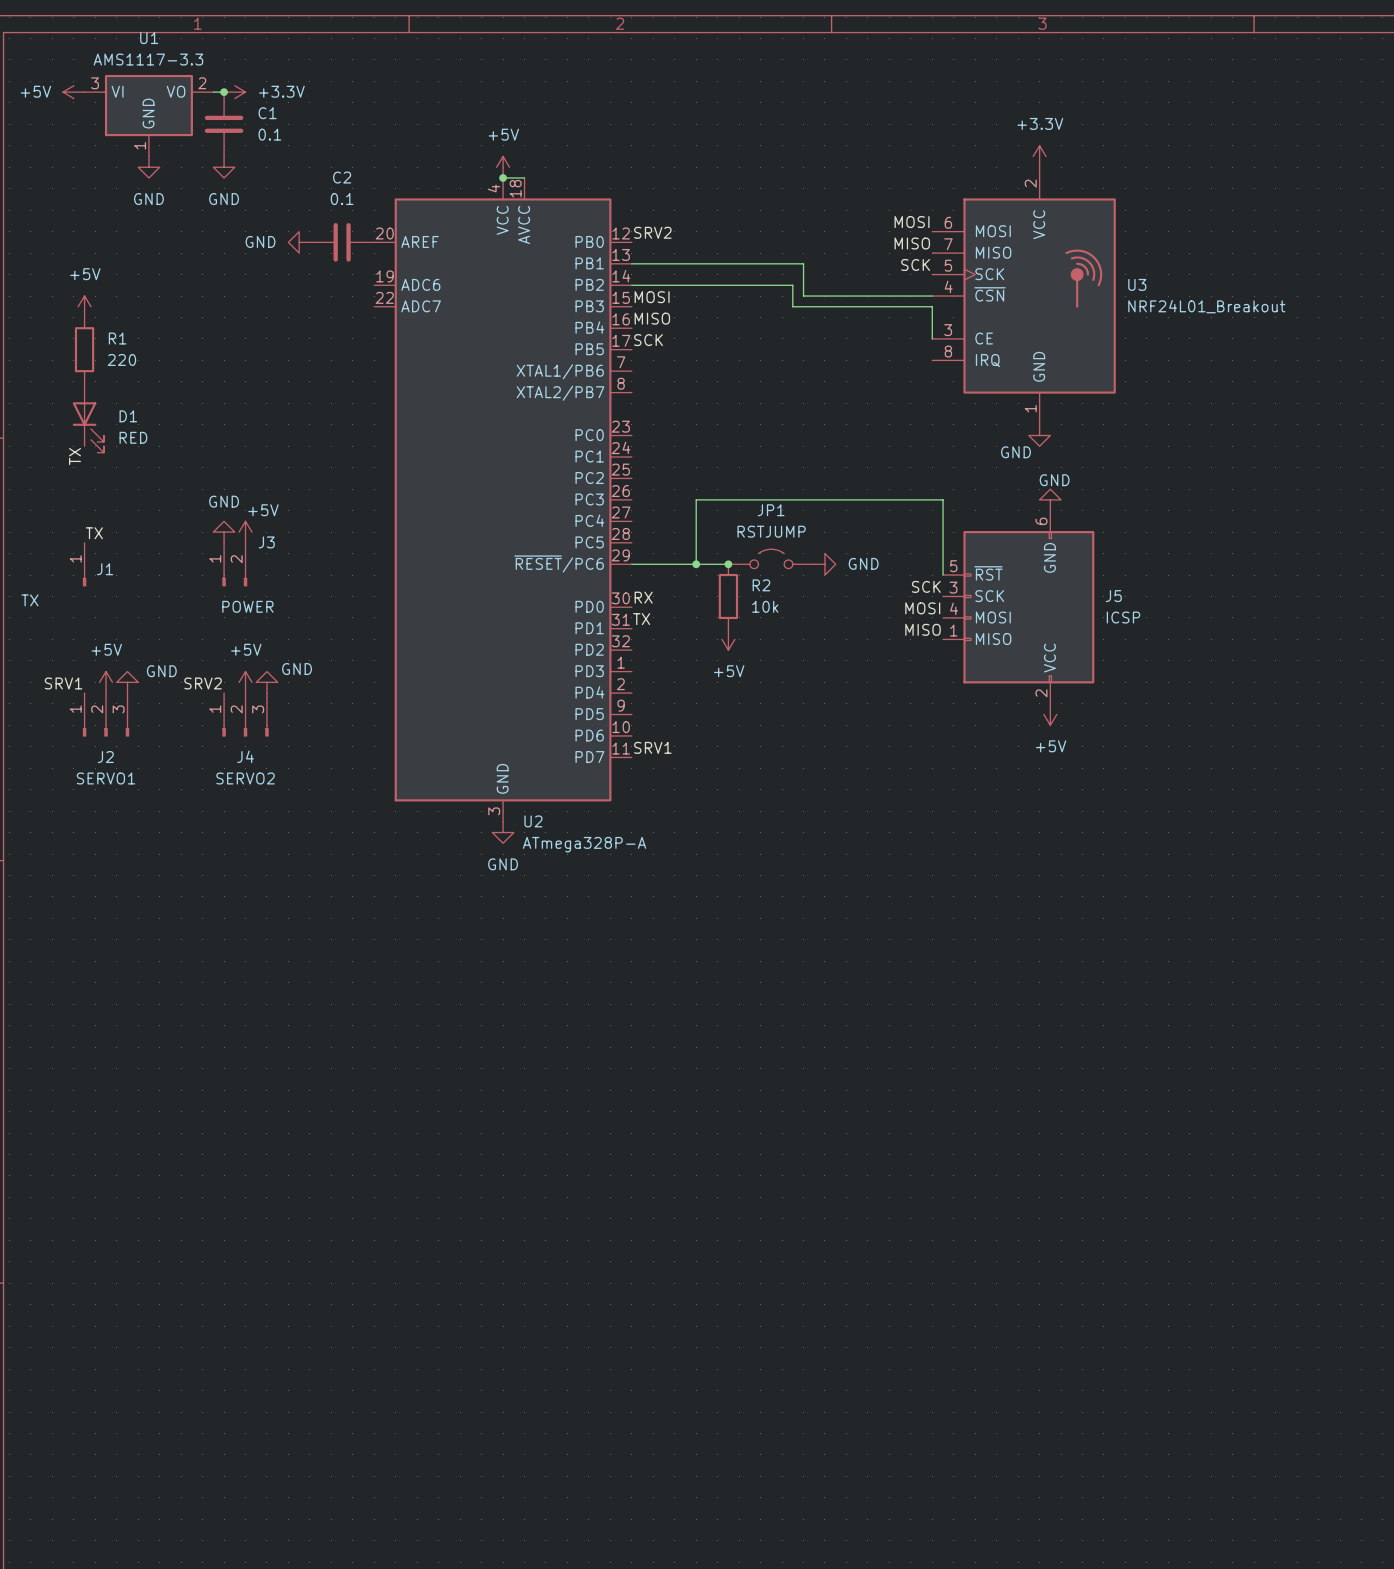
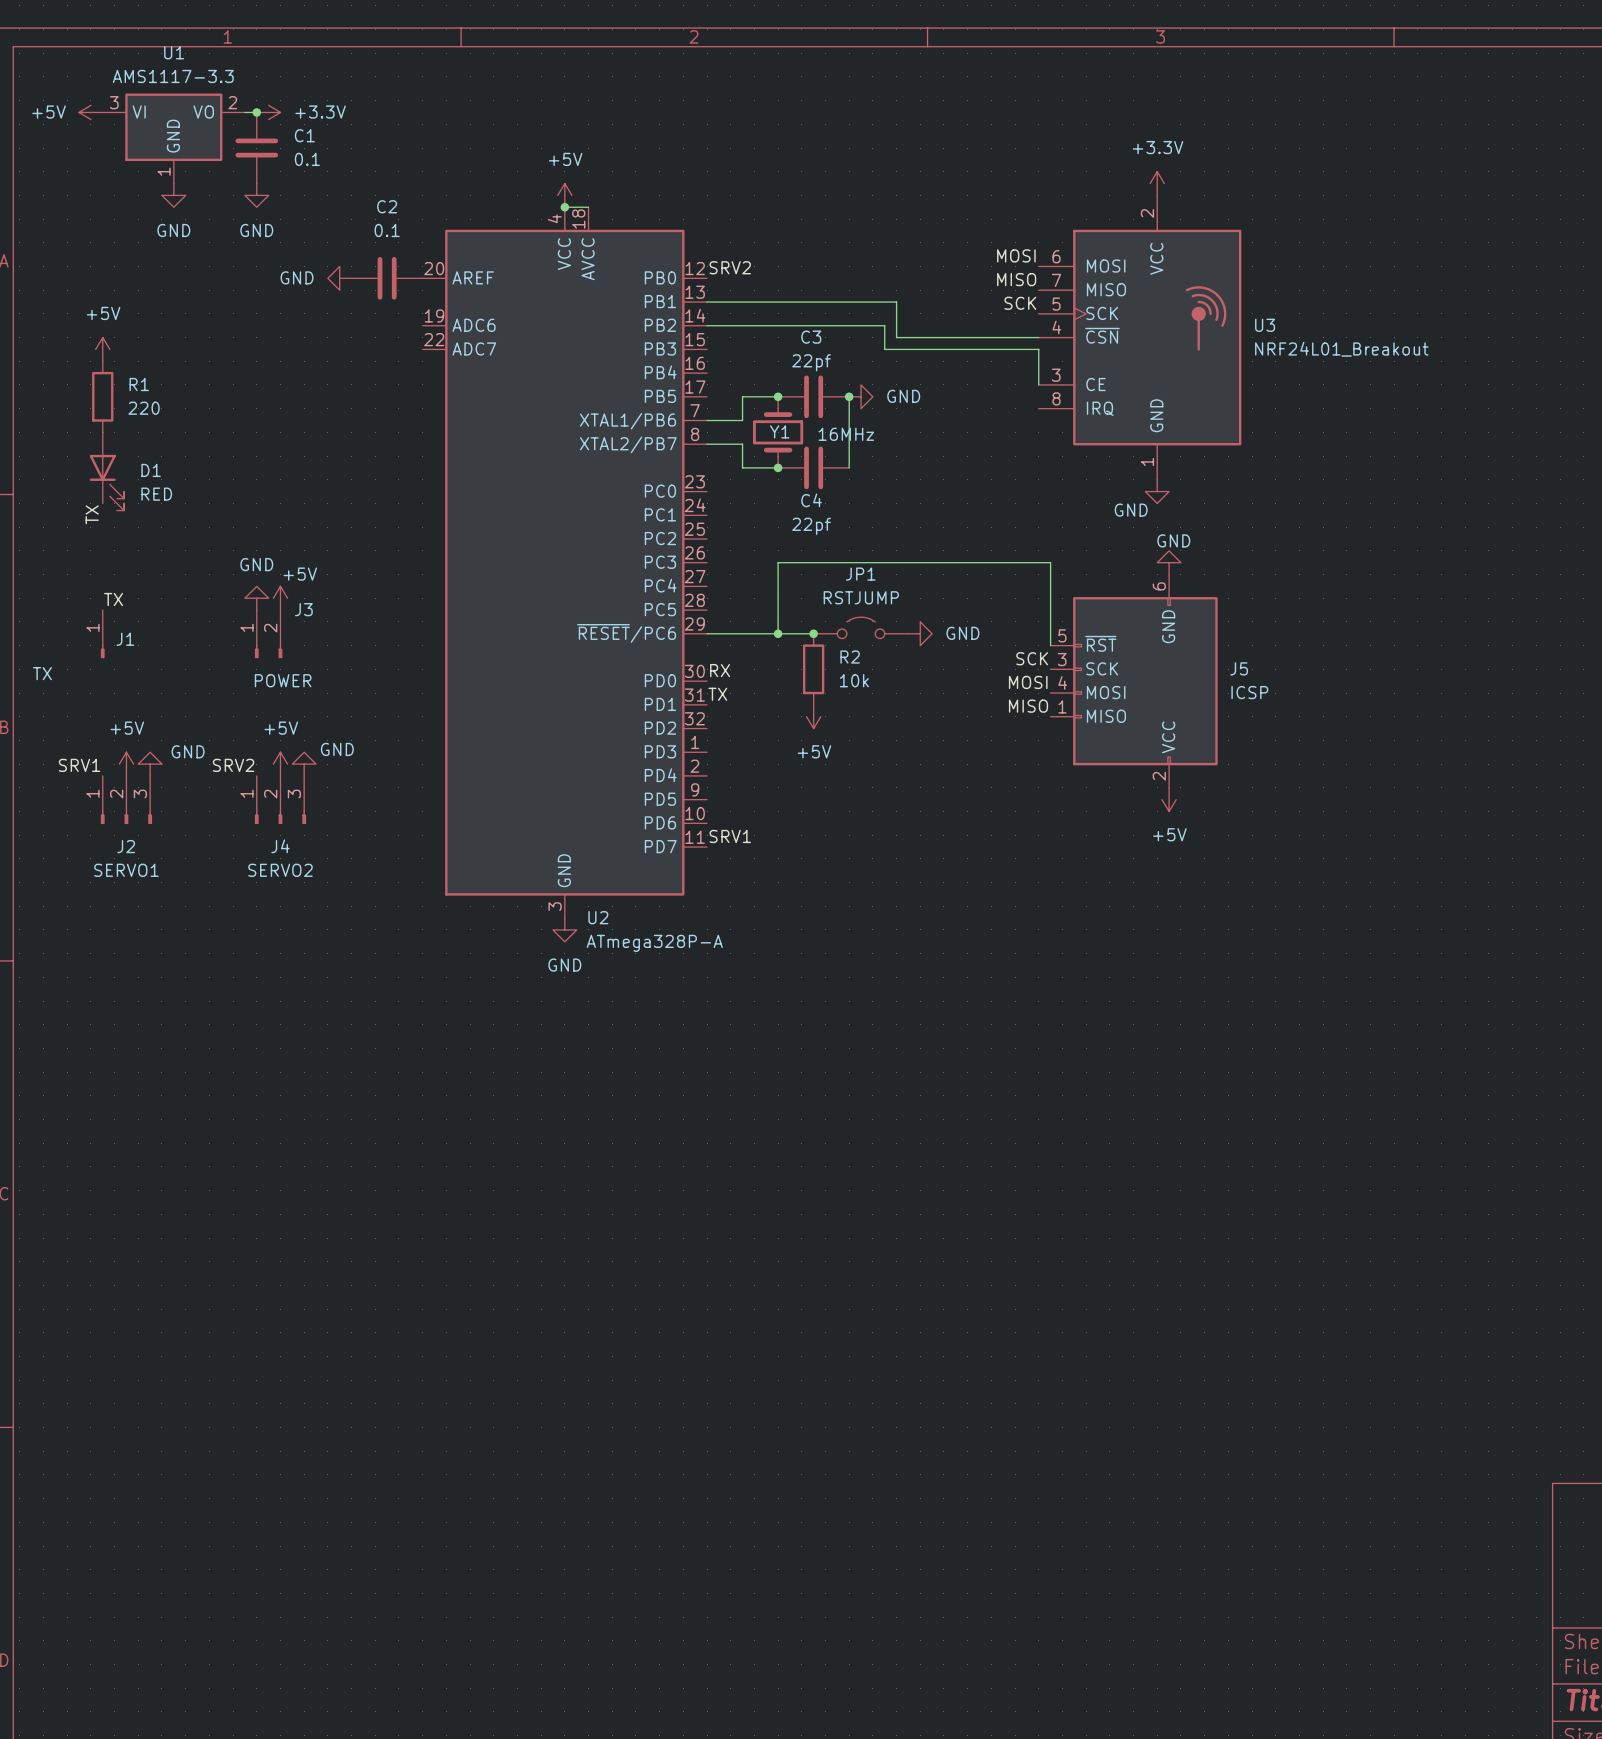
label: MOSI (652, 297) -> none
label: MISO (652, 318) -> none
label: SCK (648, 340) -> none
wire: none -> (778, 396) (742, 396) (742, 420) (707, 420)
junction: none -> (778, 396)
C3: none -> 22pf (813, 396)
wire: none -> (849, 396) (849, 467)
junction: none -> (849, 396)
power symbol: none -> GND (861, 396)
Y1: none -> 16MHz (778, 432)
wire: none -> (707, 444) (742, 444) (742, 467) (778, 467)
junction: none -> (778, 467)
C4: none -> 22pf (813, 467)

